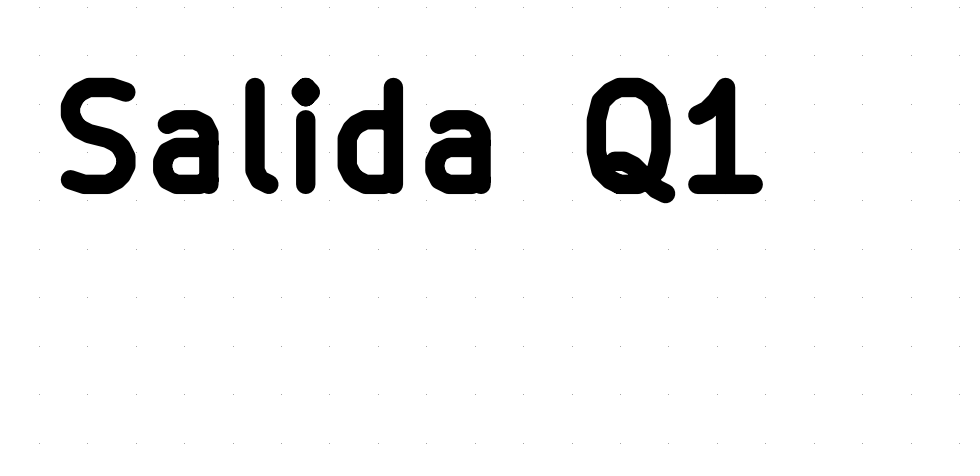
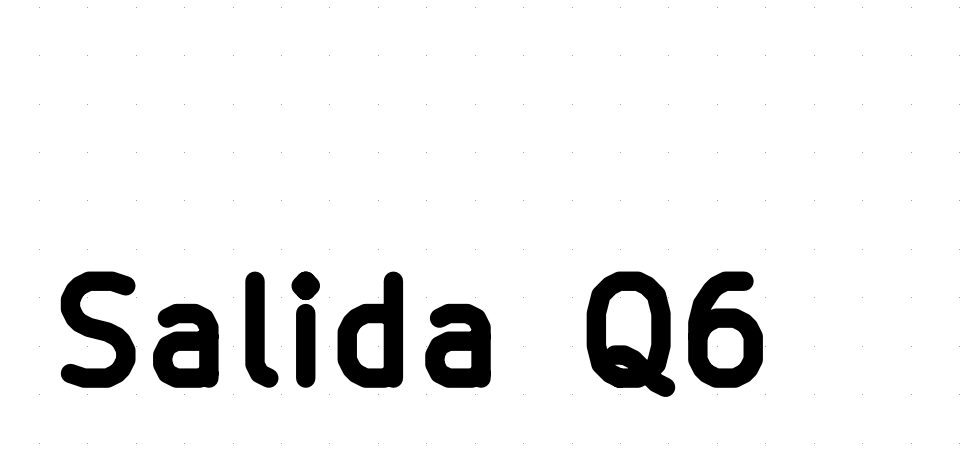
text: Salida Q1 (411, 140) -> Salida Q6 (411, 334)

